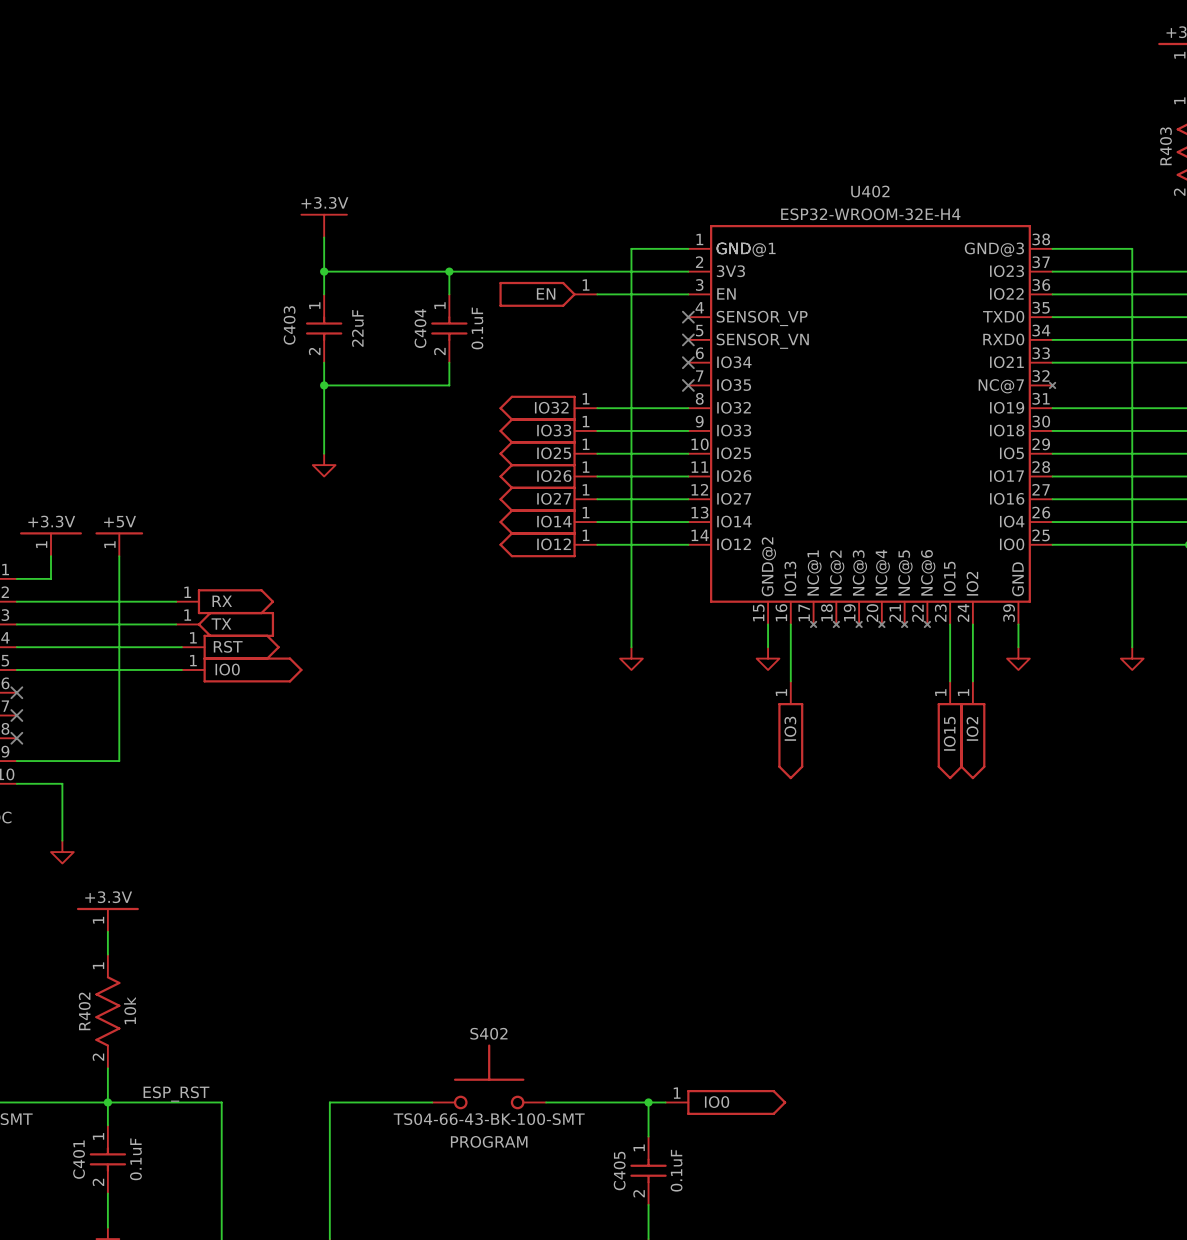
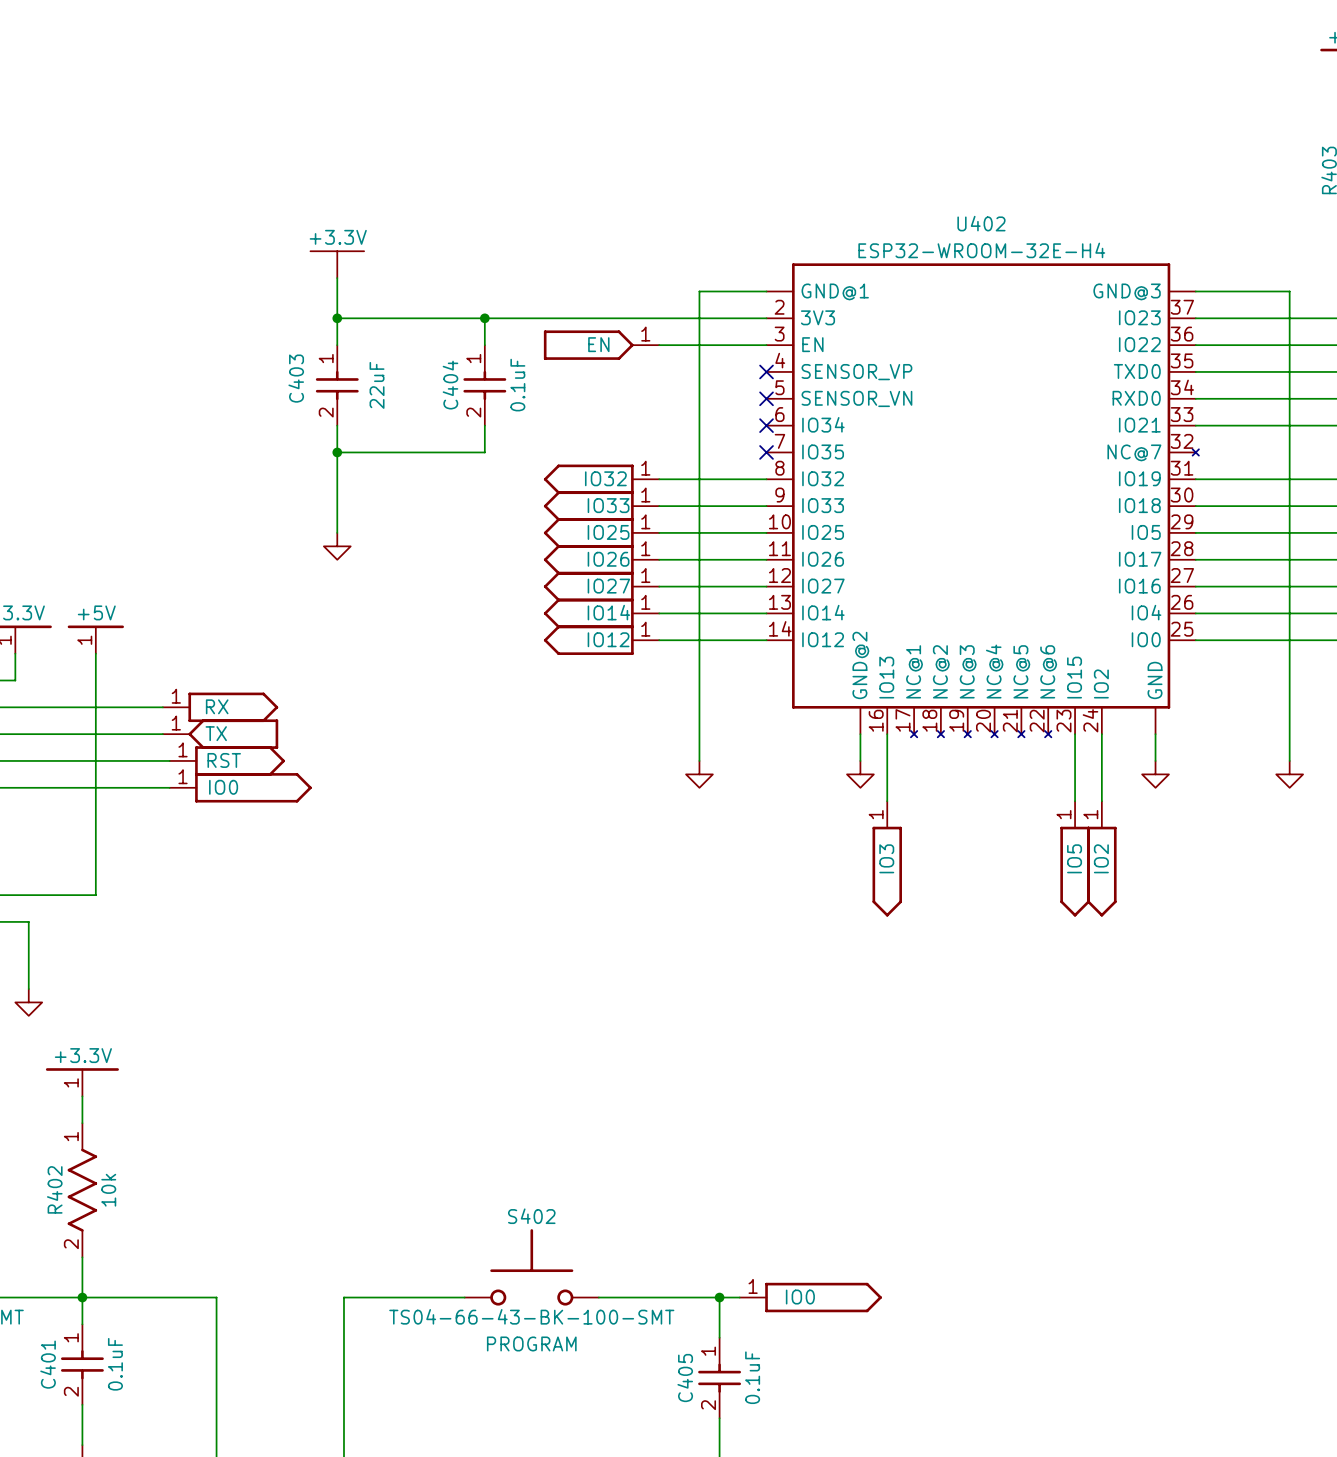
U402 symbol: [688, 224, 1056, 628] -> [766, 263, 1199, 738]
power symbol: IO15 (950, 730) -> IO5 (1075, 858)
label: ESP_RST (176, 1094) -> none

